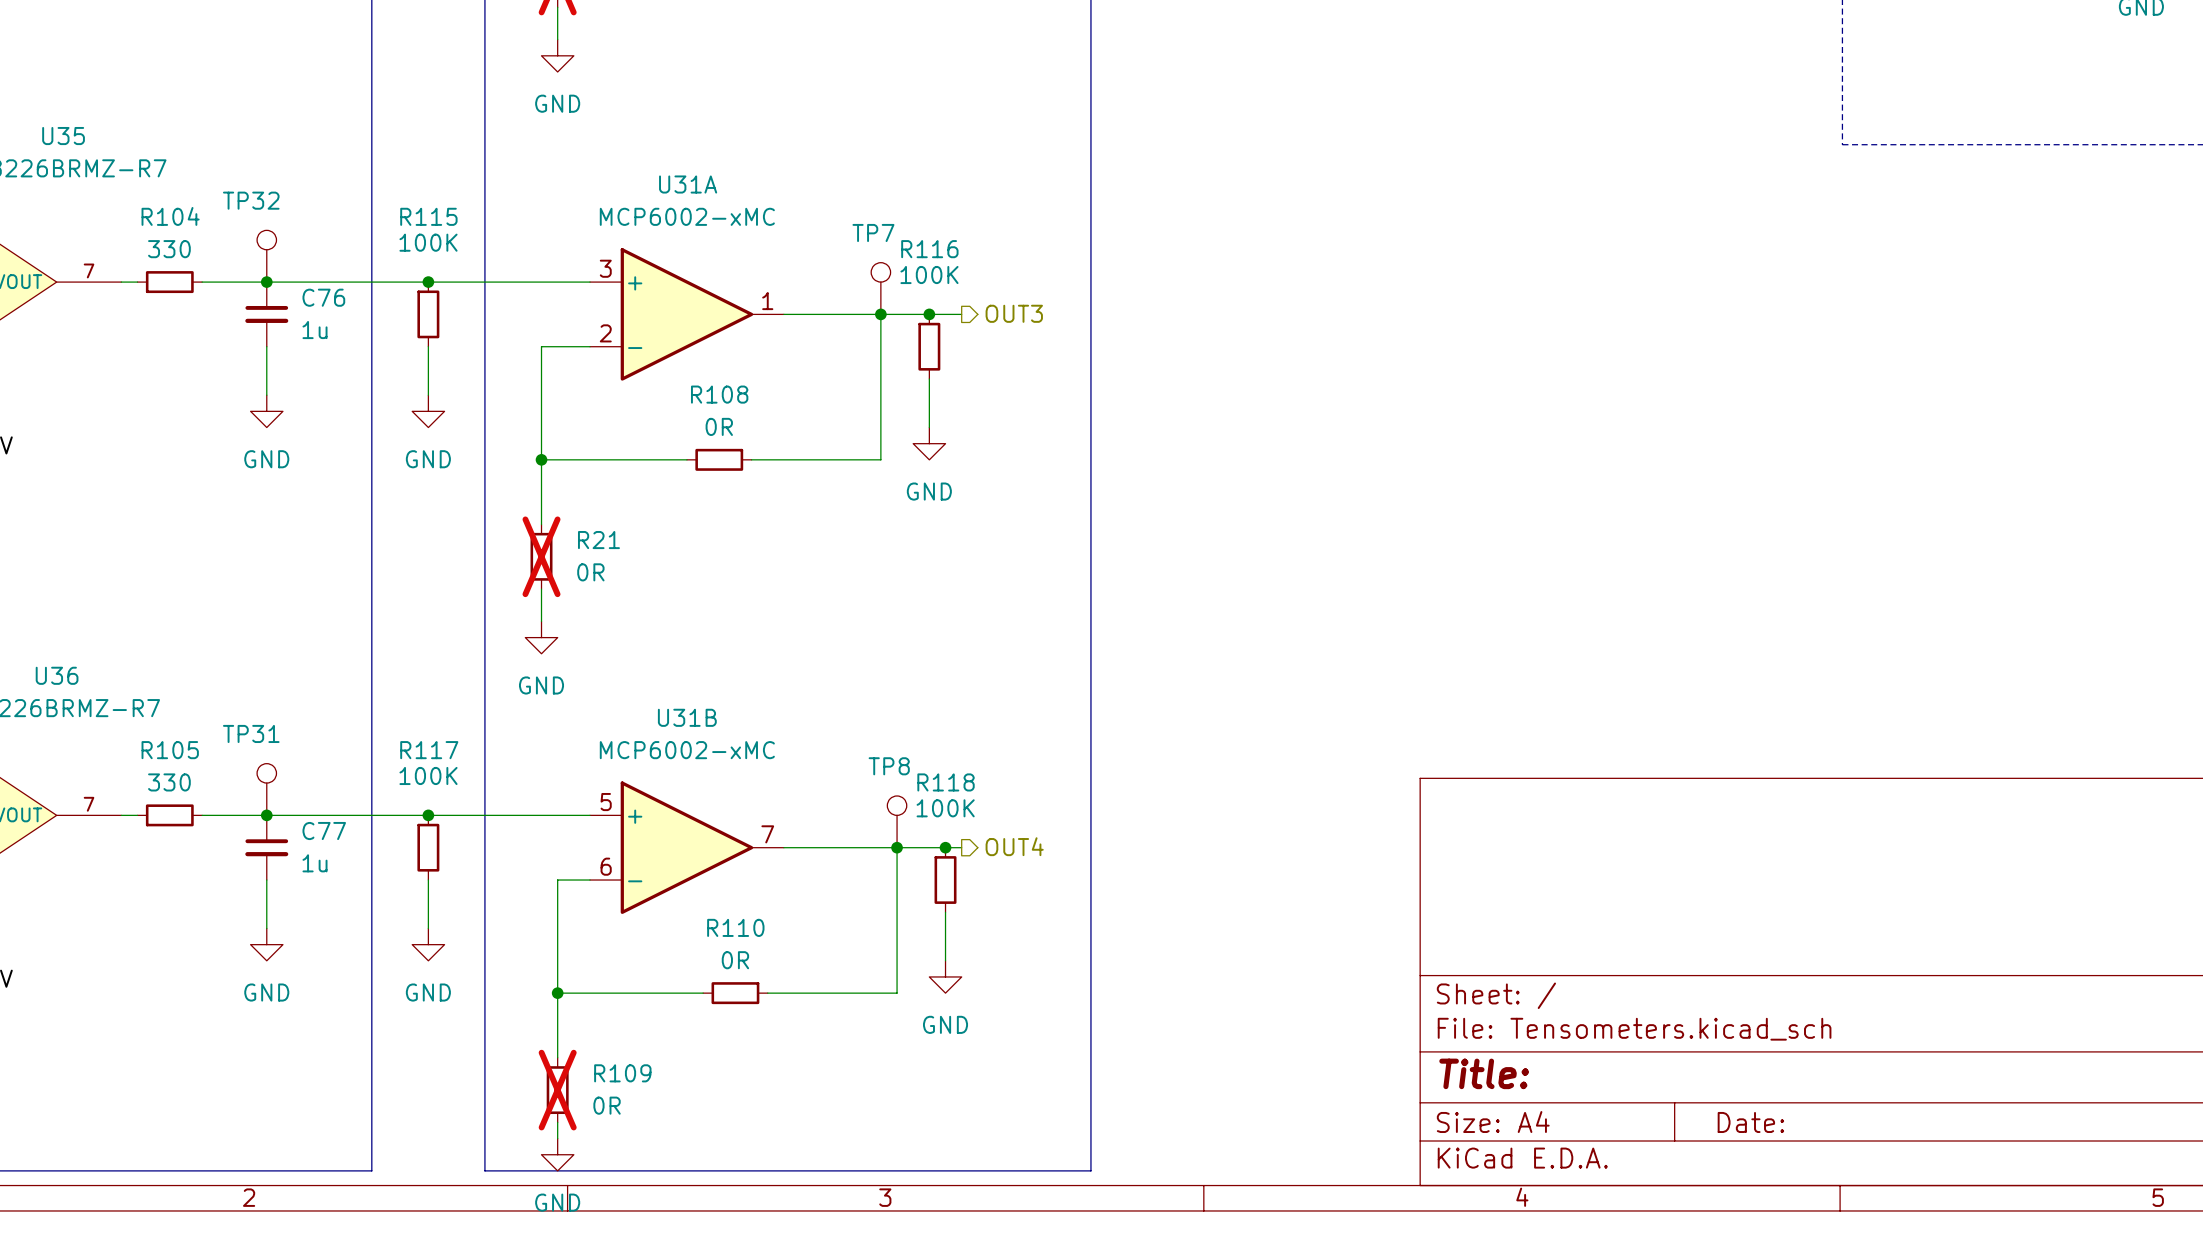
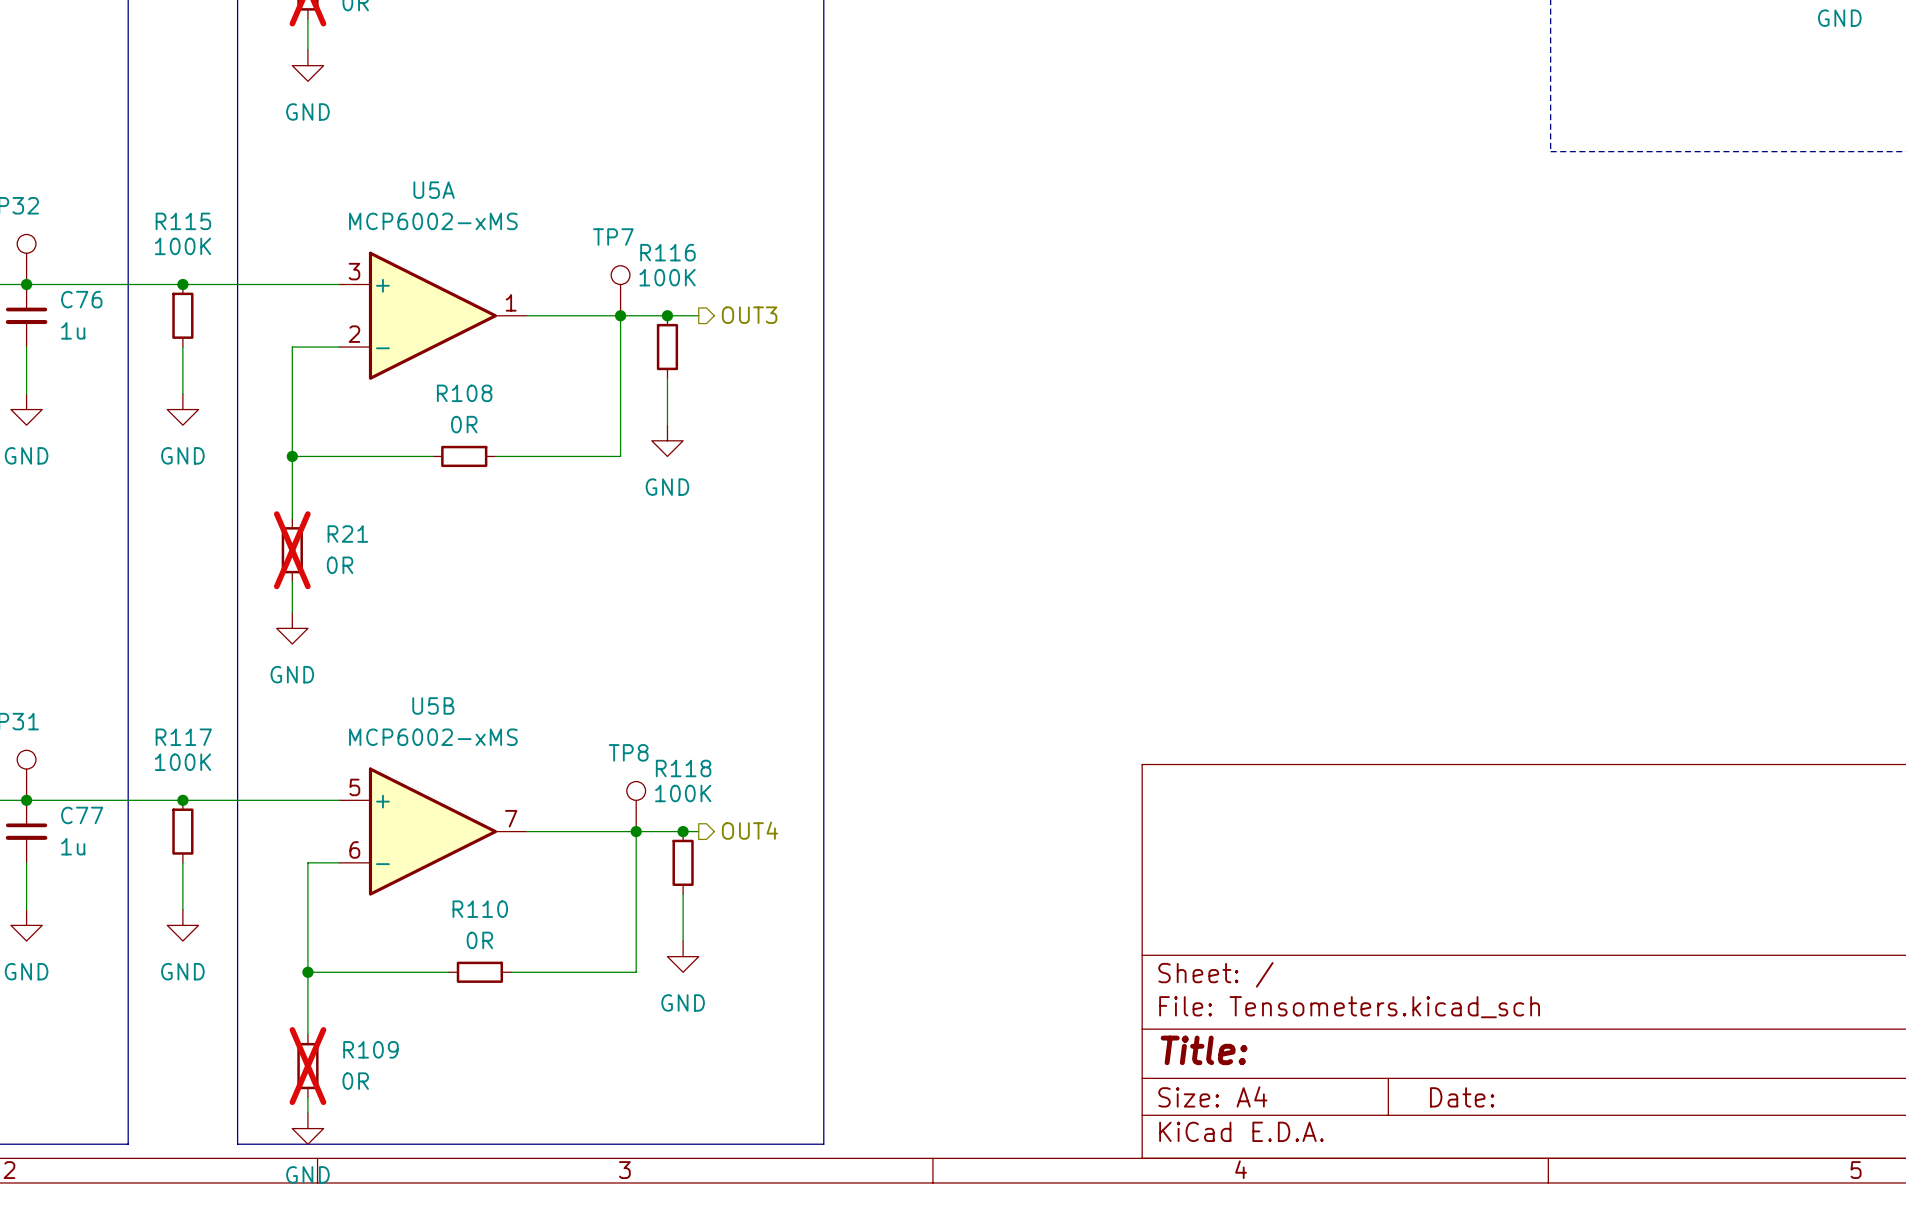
U31A name: U31A (688, 184) -> U5A (434, 190)
U31A value: MCP6002-xMC (687, 216) -> MCP6002-xMS (433, 221)
U31B name: U31B (687, 717) -> U5B (433, 705)
U31B value: MCP6002-xMC (687, 750) -> MCP6002-xMS (433, 737)

